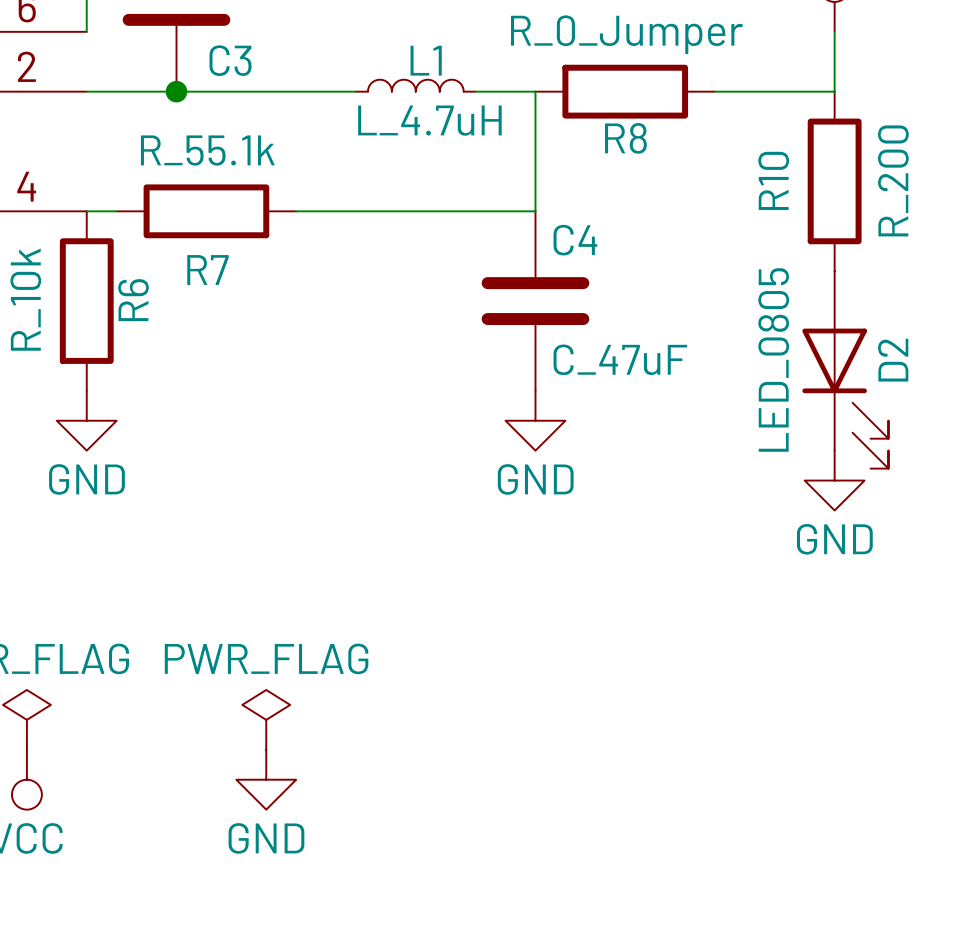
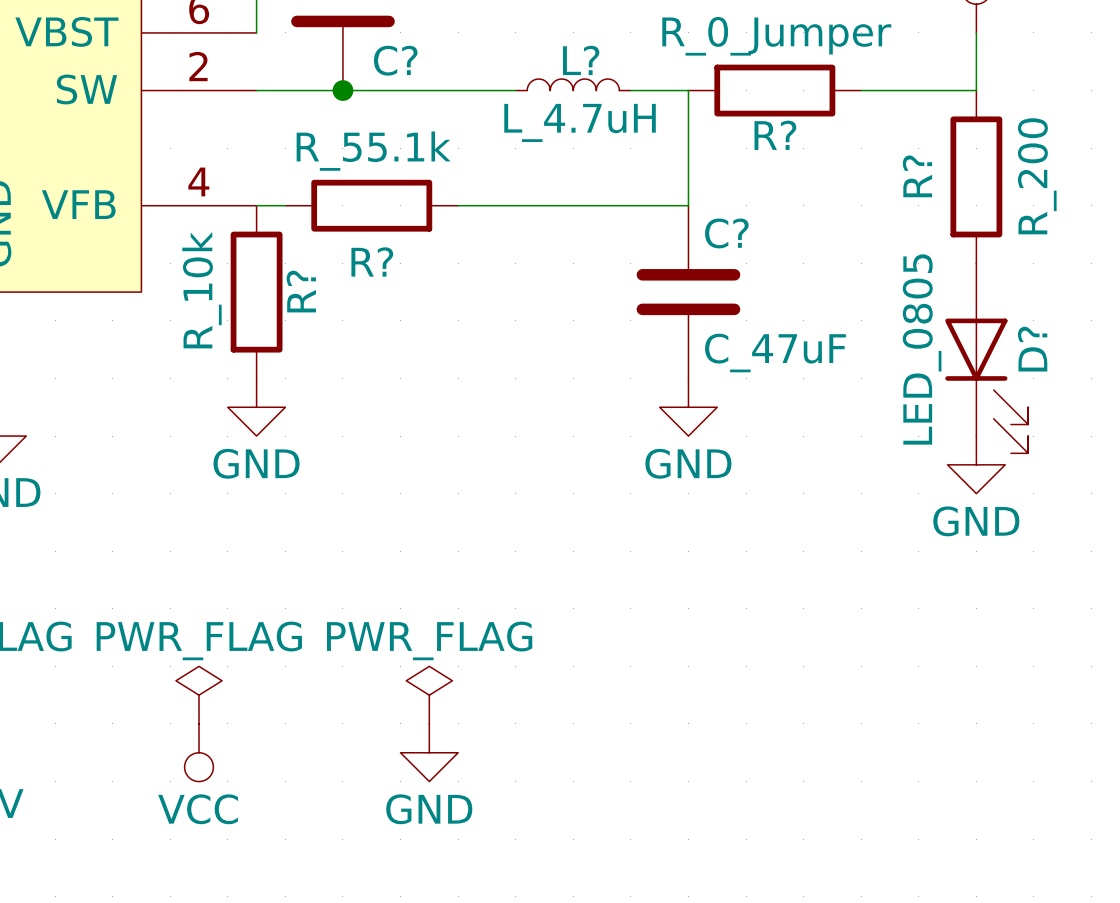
C3 name: C3 (230, 60) -> C? (395, 60)
L1 name: L1 (426, 60) -> L? (581, 60)
R8 name: R8 (625, 138) -> R? (775, 135)
R10 name: R10 (773, 180) -> R? (917, 176)
C4 name: C4 (575, 240) -> C? (726, 233)
R7 name: R7 (207, 270) -> R? (372, 261)
R6 name: R6 (133, 300) -> R? (301, 291)
D2 name: D2 (893, 360) -> D? (1032, 349)

